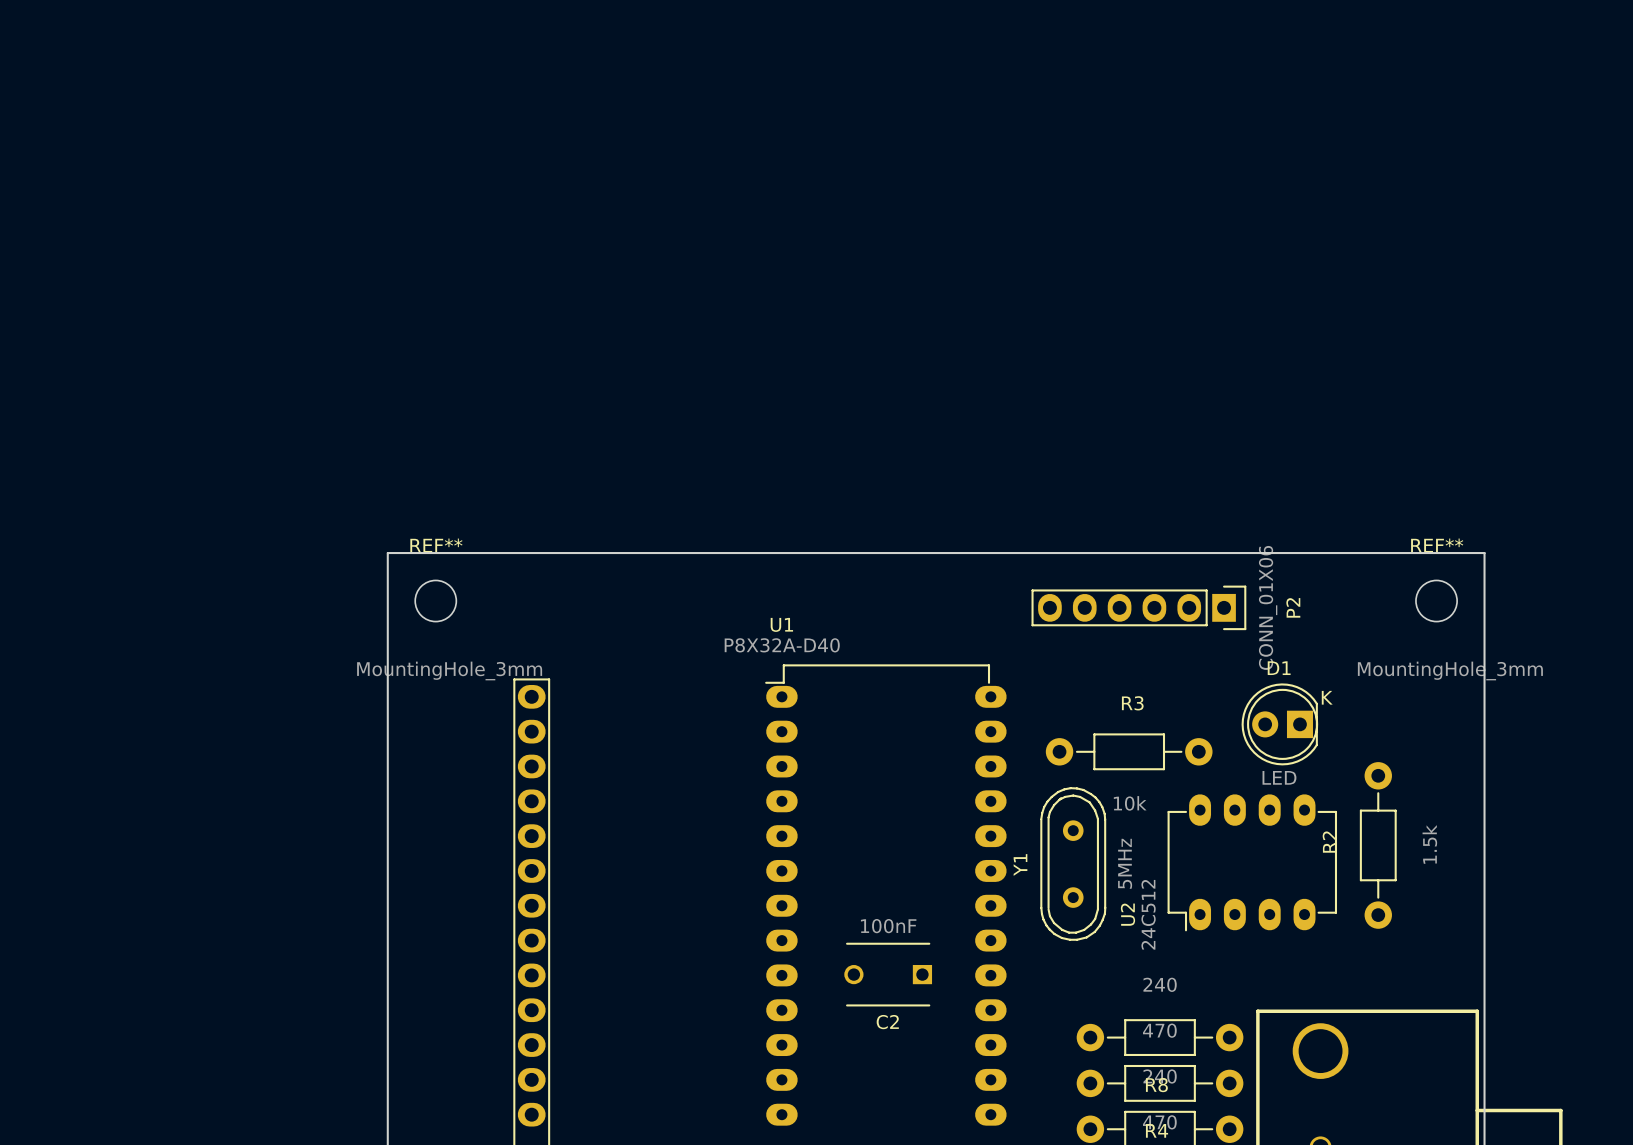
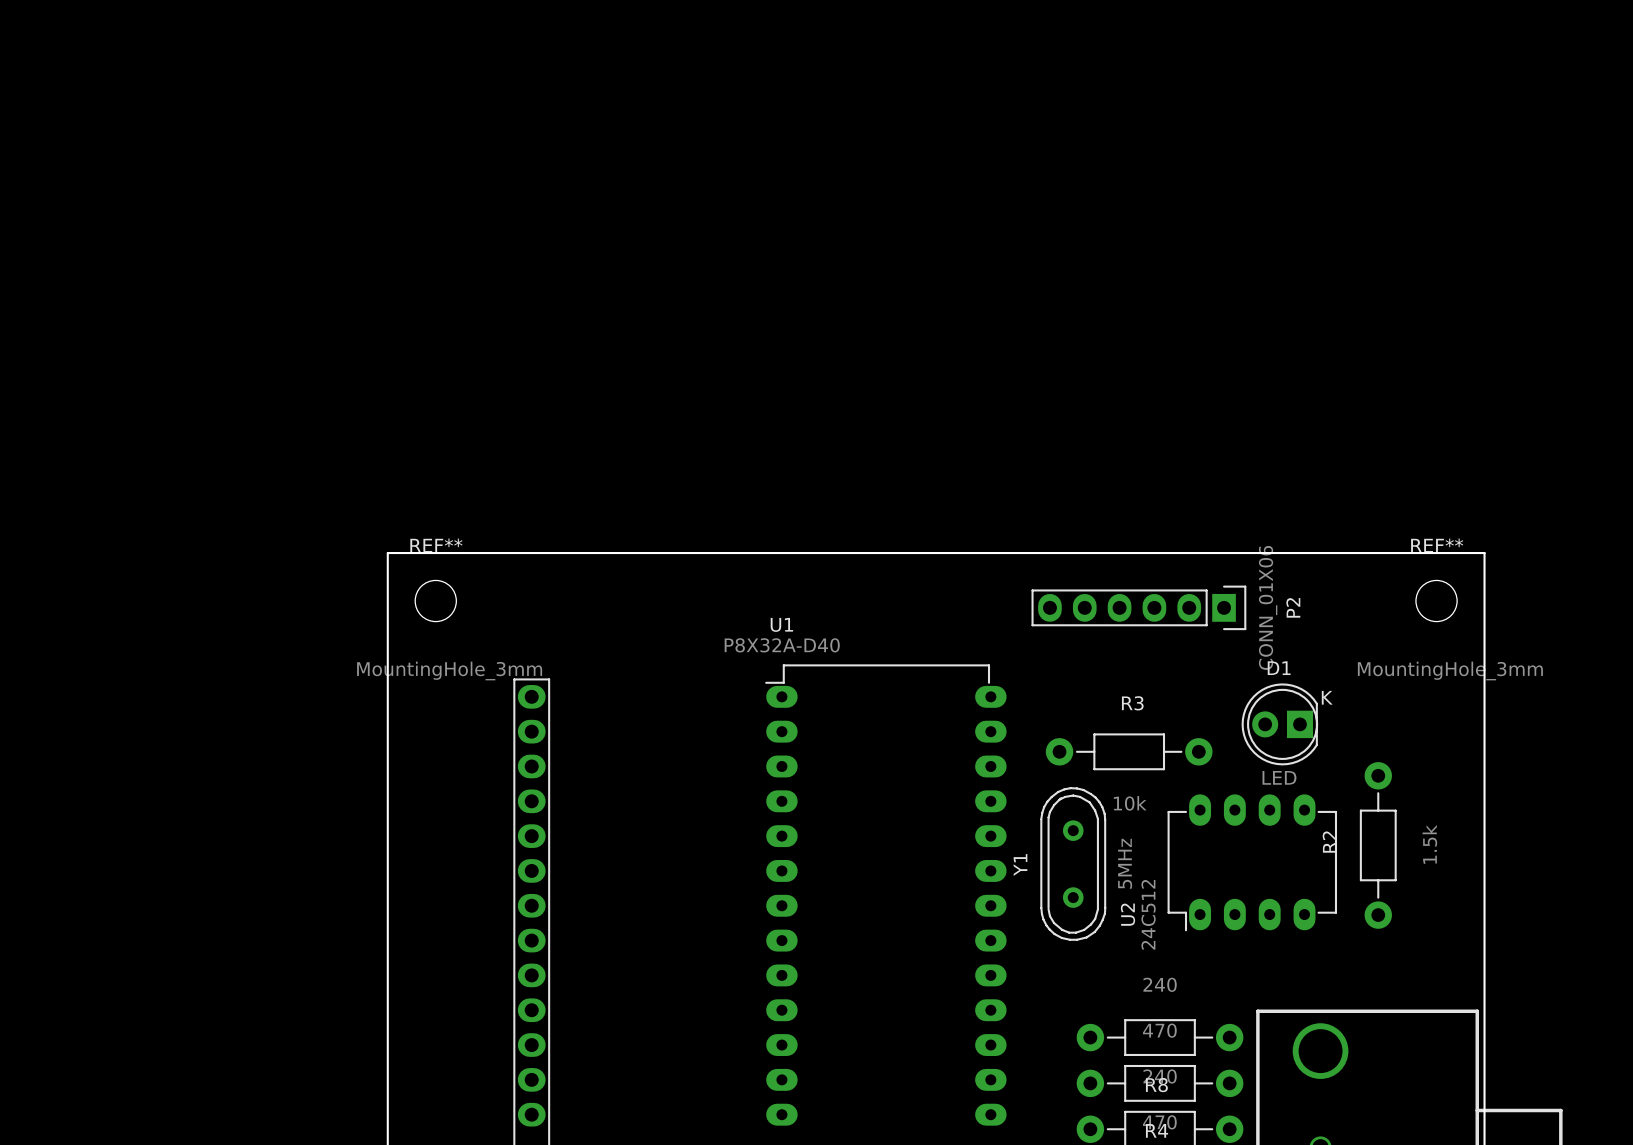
C2: 100nF (888, 974) -> none

